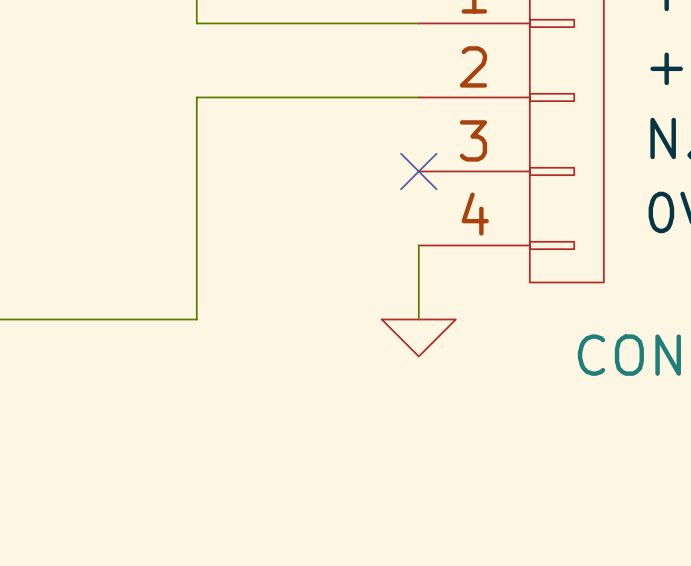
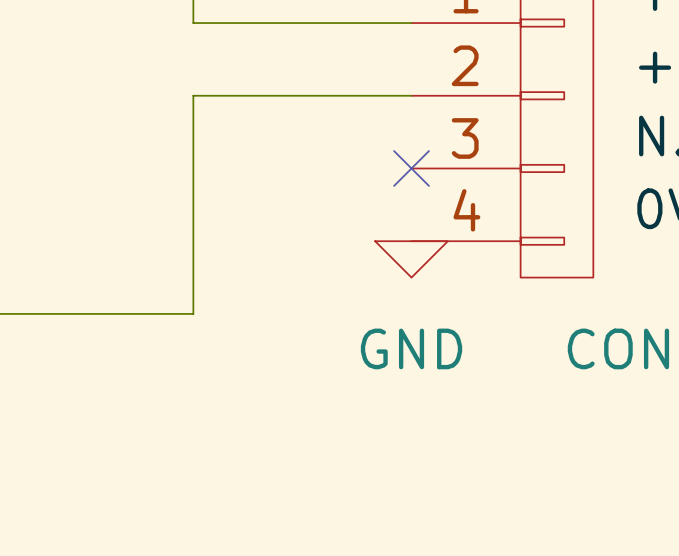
wire: (418, 245) (418, 319) -> none
power symbol: none -> GND (411, 259)
power symbol: (418, 337) -> none

